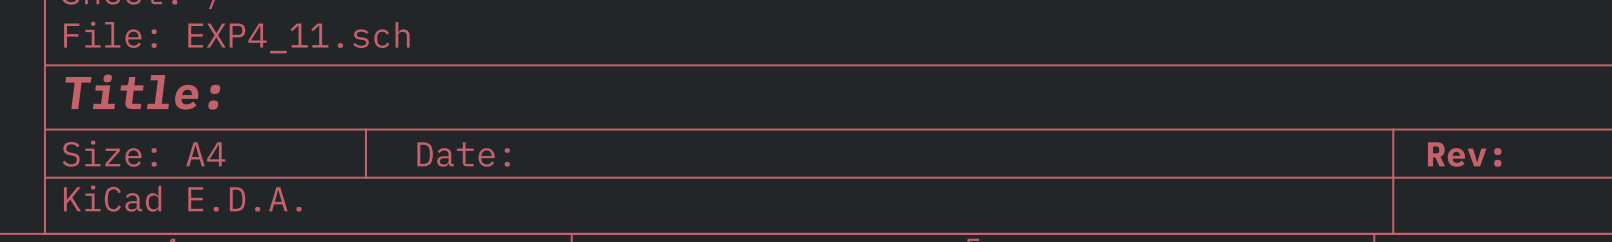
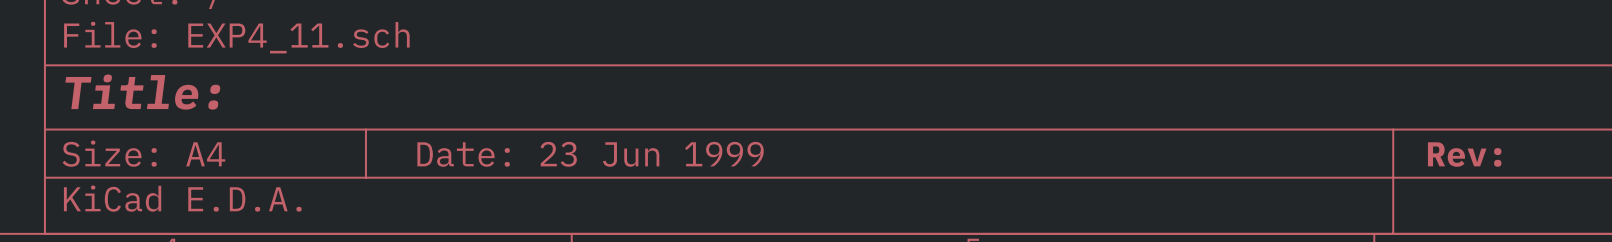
title block: Date: (463, 154) -> Date: 23 Jun 1999 (590, 154)

